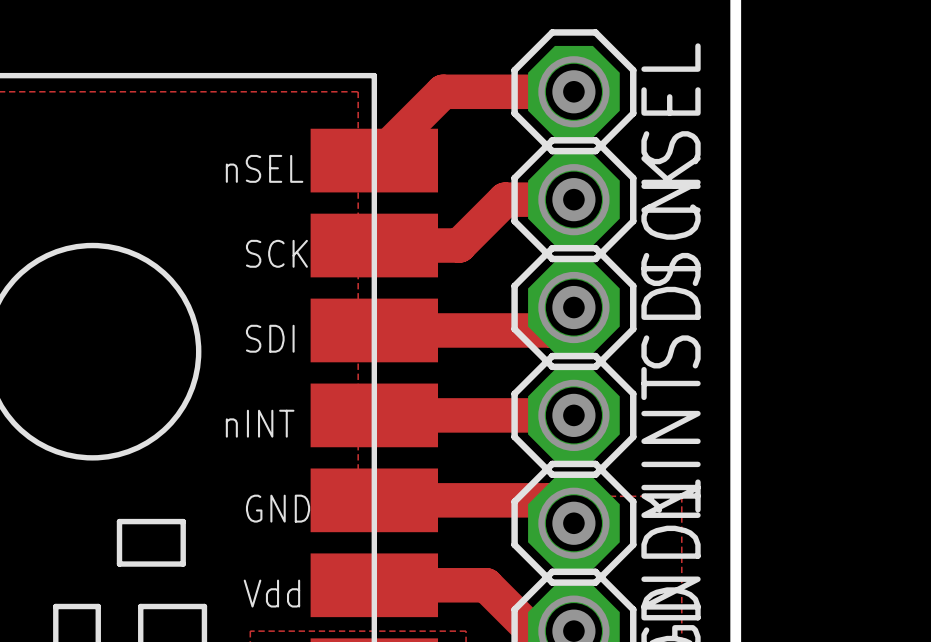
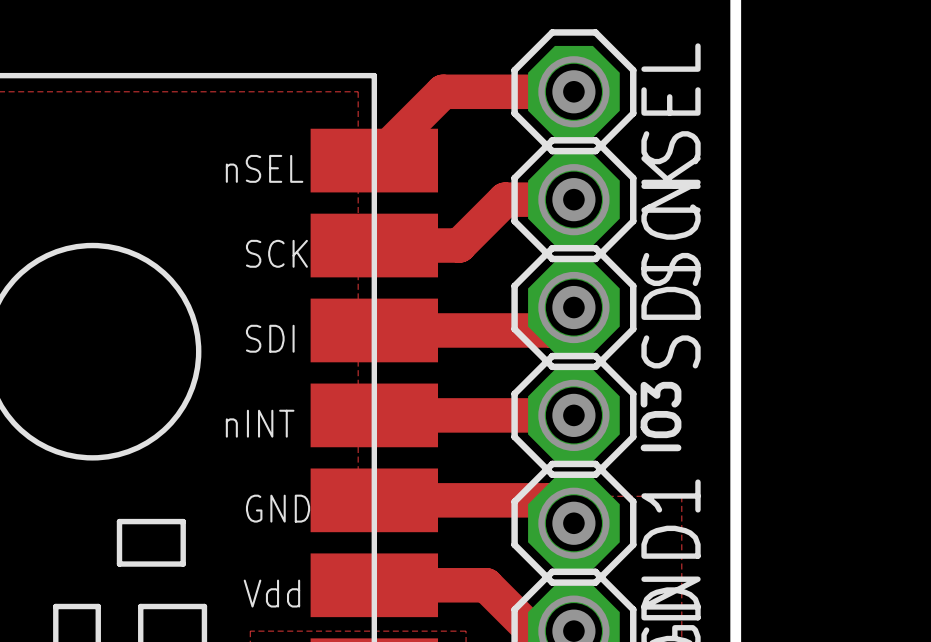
NINT name: NINT (671, 442) -> IO3 (661, 416)

